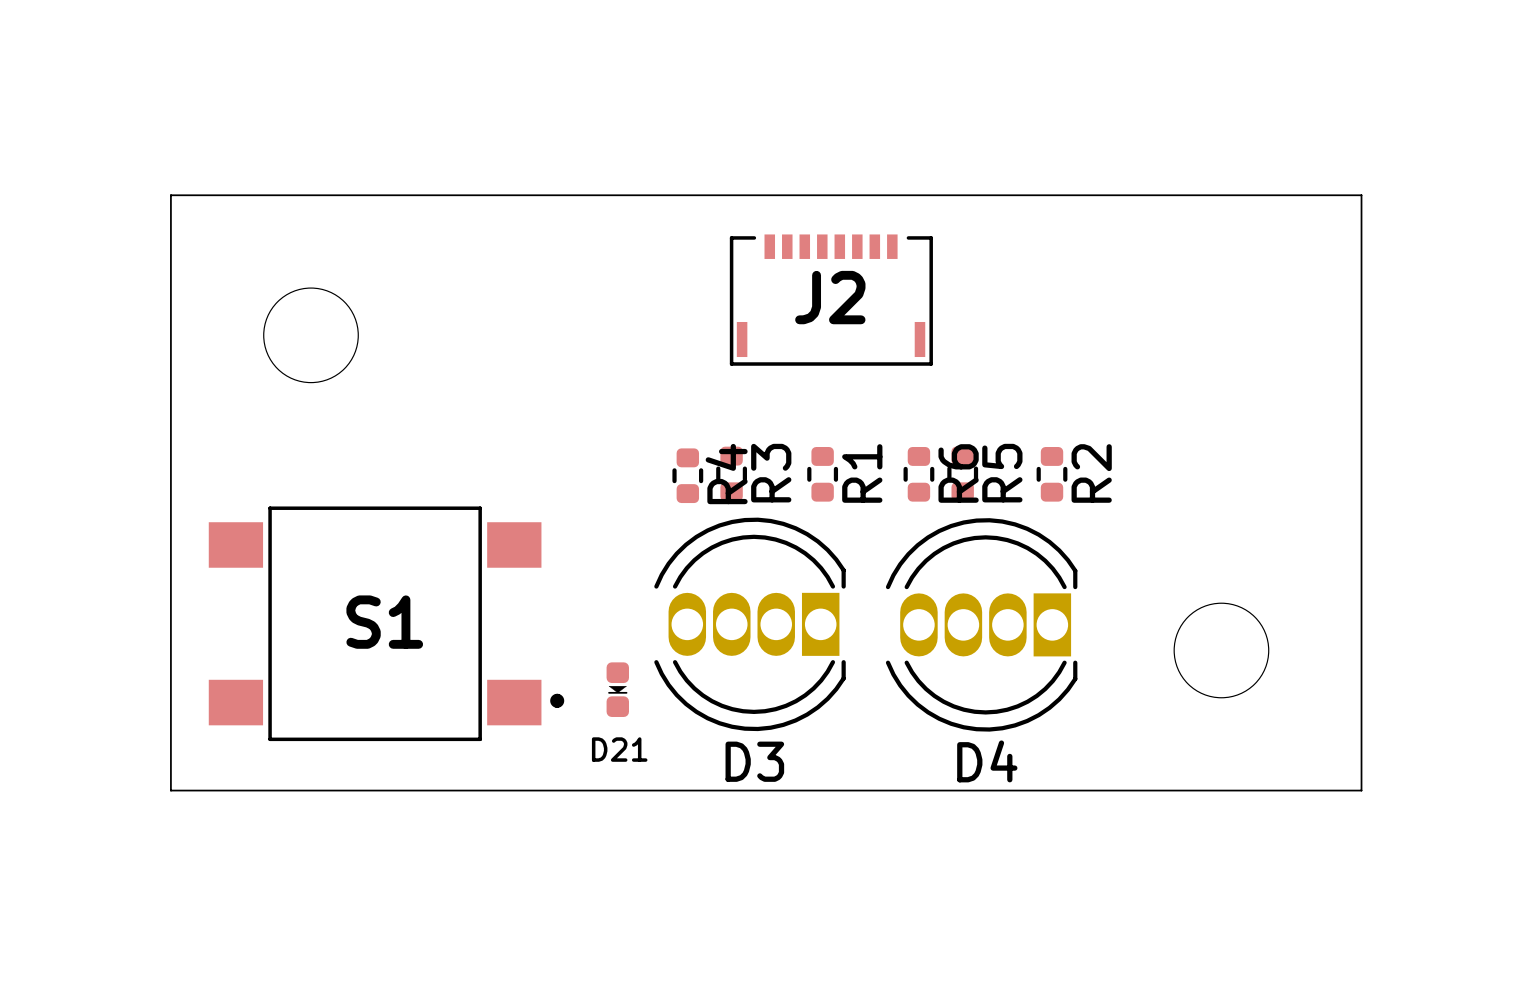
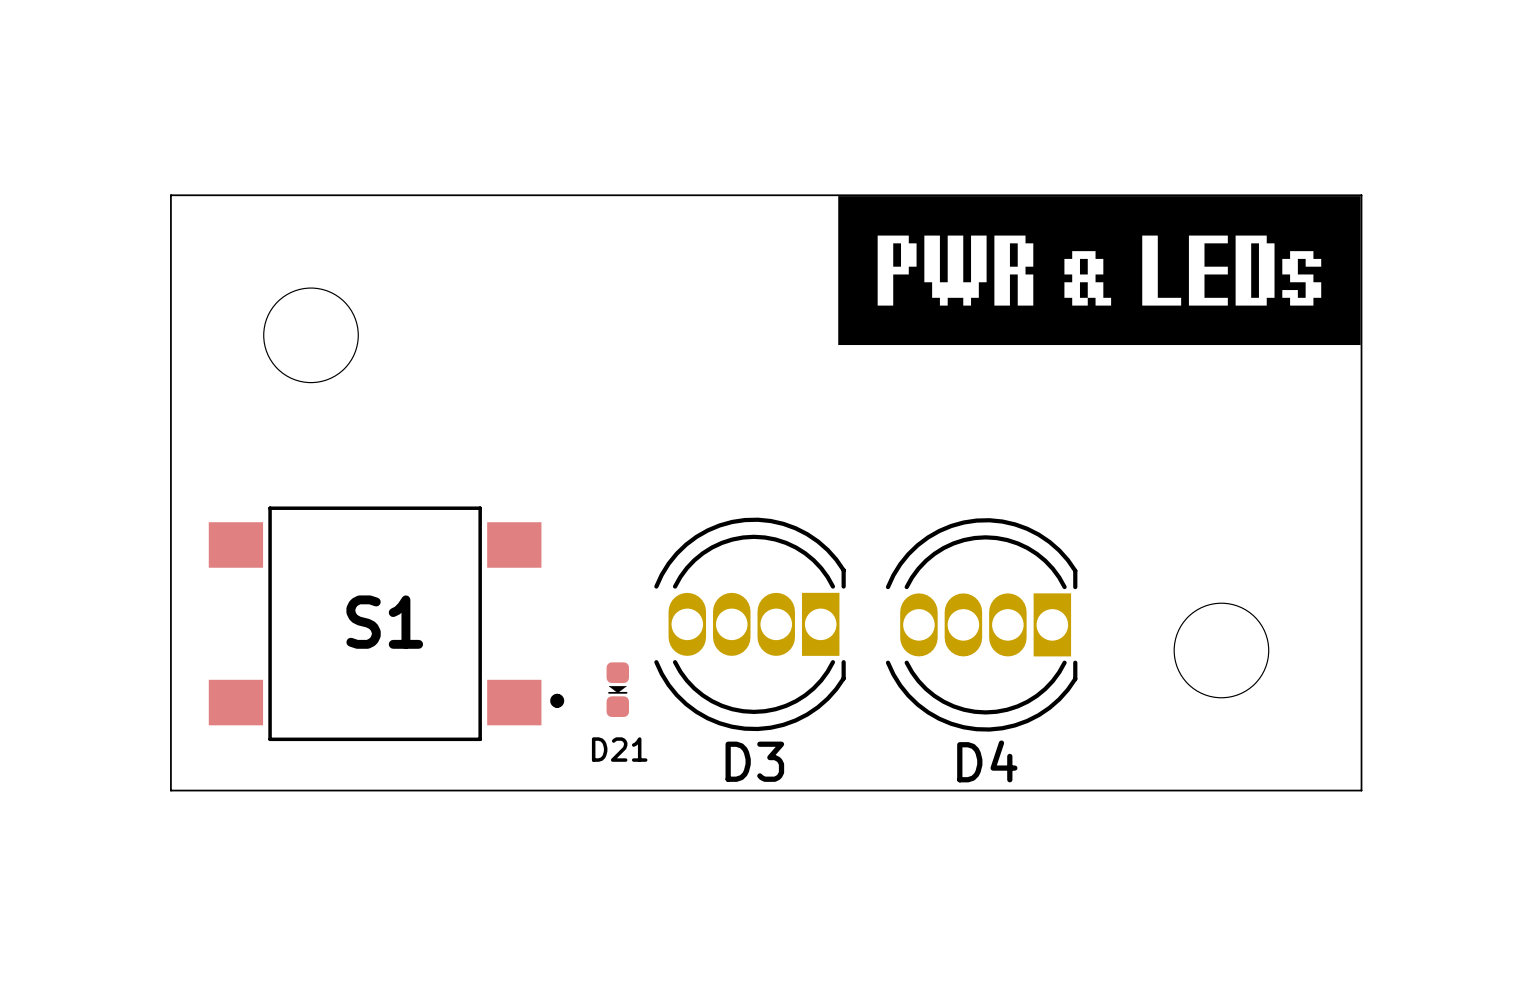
drawing: none -> [838, 196, 1361, 346]
J2: (831, 300) -> none
R3: (731, 473) -> none
R5: (962, 473) -> none
R1: (822, 474) -> none
R6: (918, 474) -> none
R2: (1051, 474) -> none
R4: (687, 475) -> none

